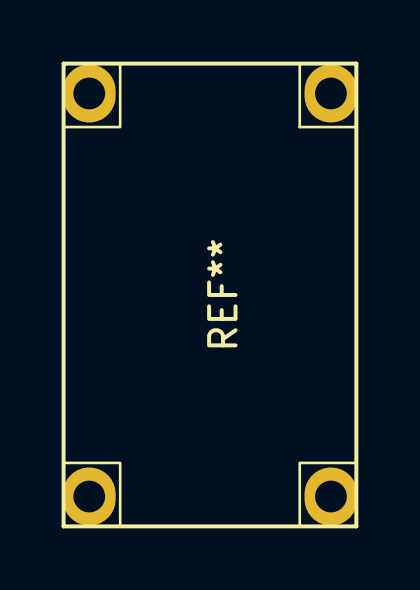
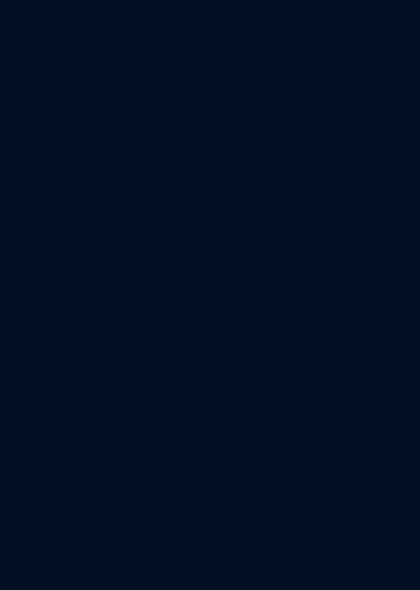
REF**: (209, 294) -> none

